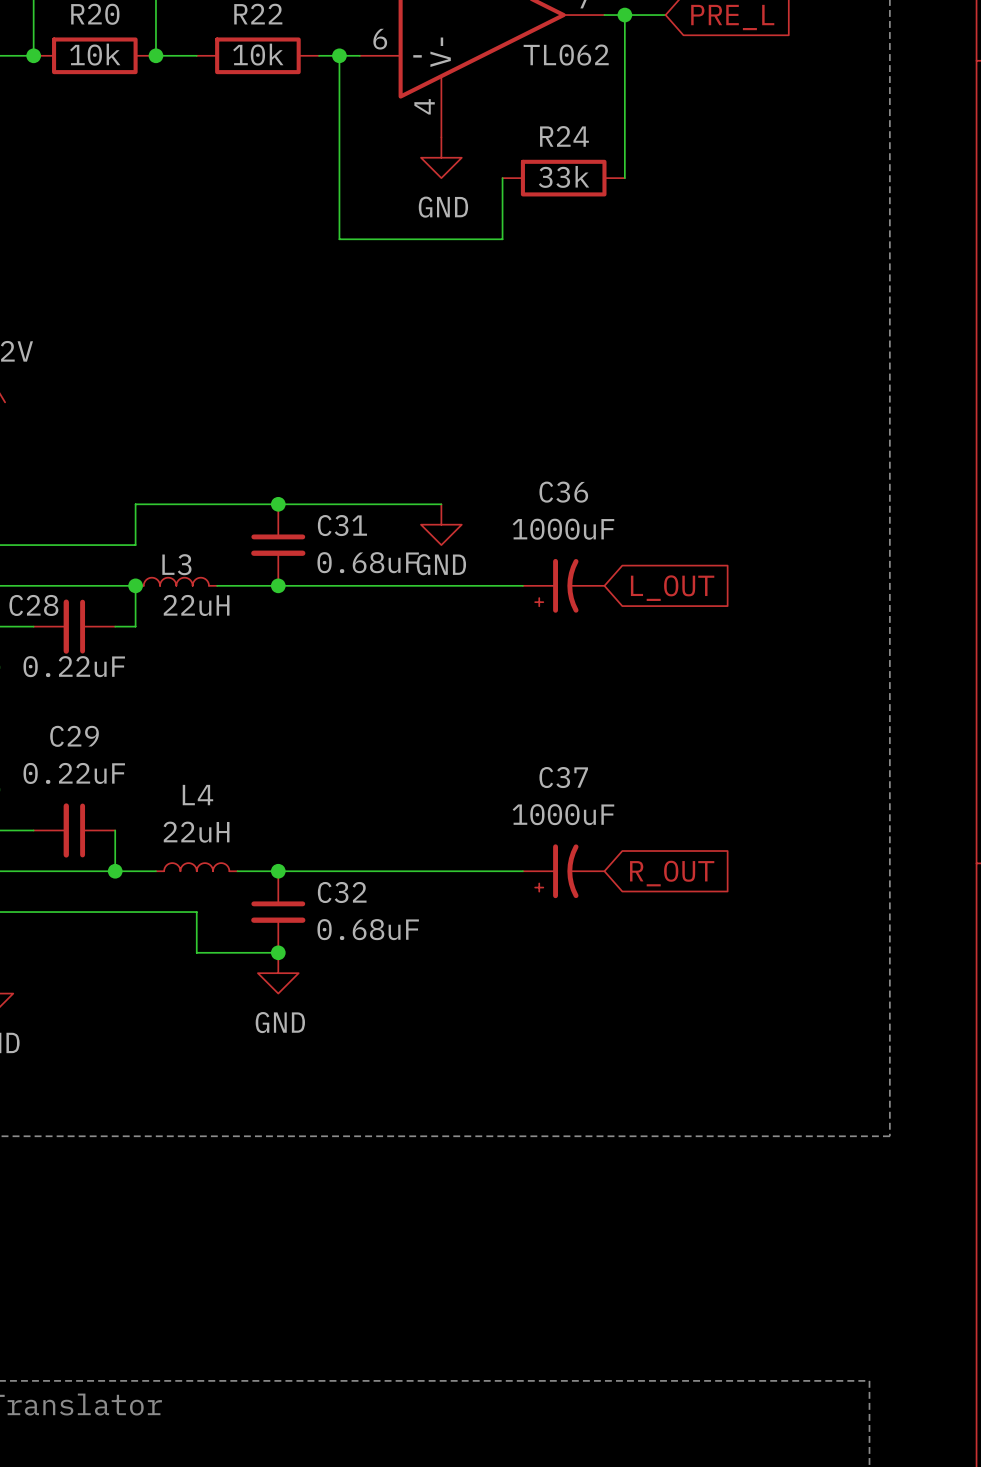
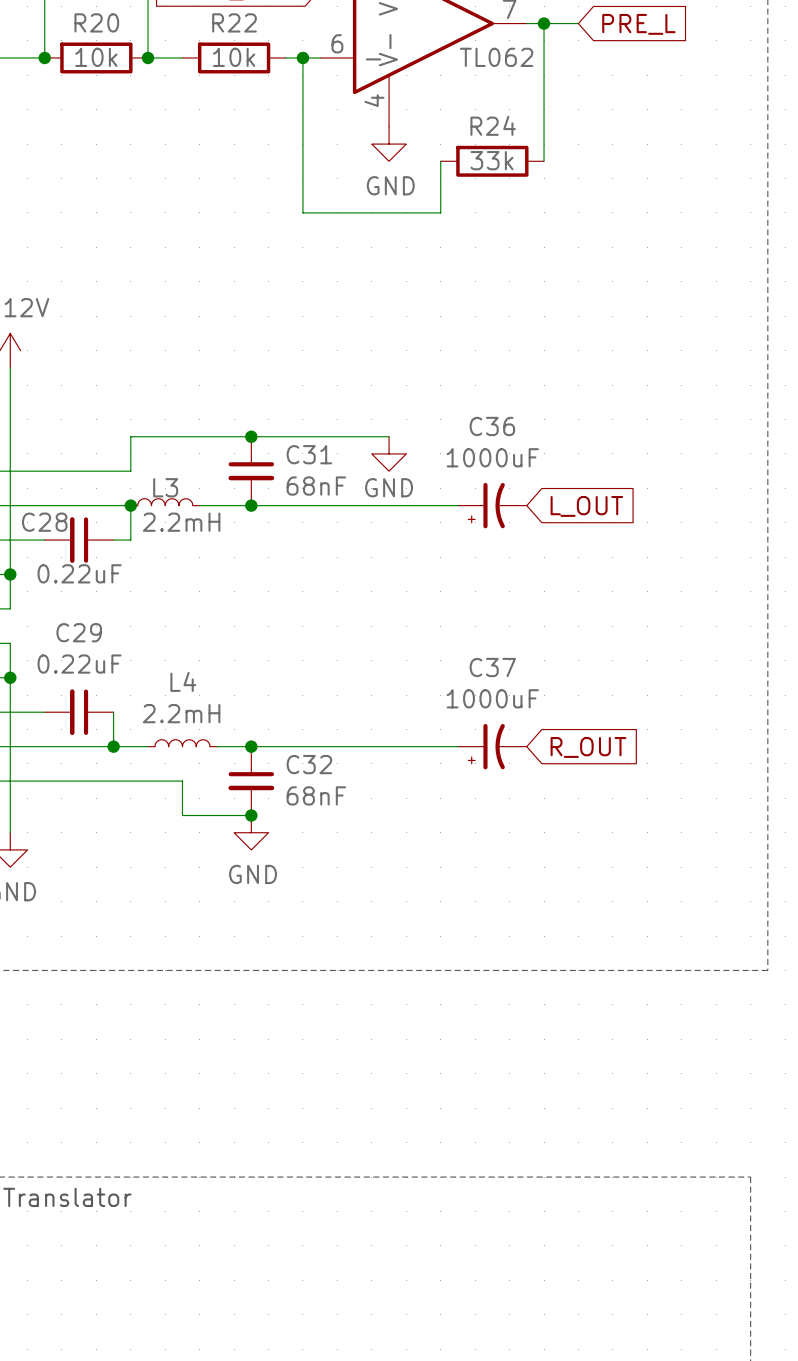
C31 value: 0.68uF (368, 562) -> 68nF (316, 486)
L3 value: 22uH (196, 605) -> 2.2mH (181, 522)
L4 value: 22uH (196, 832) -> 2.2mH (181, 713)
C32 value: 0.68uF (368, 929) -> 68nF (316, 795)

